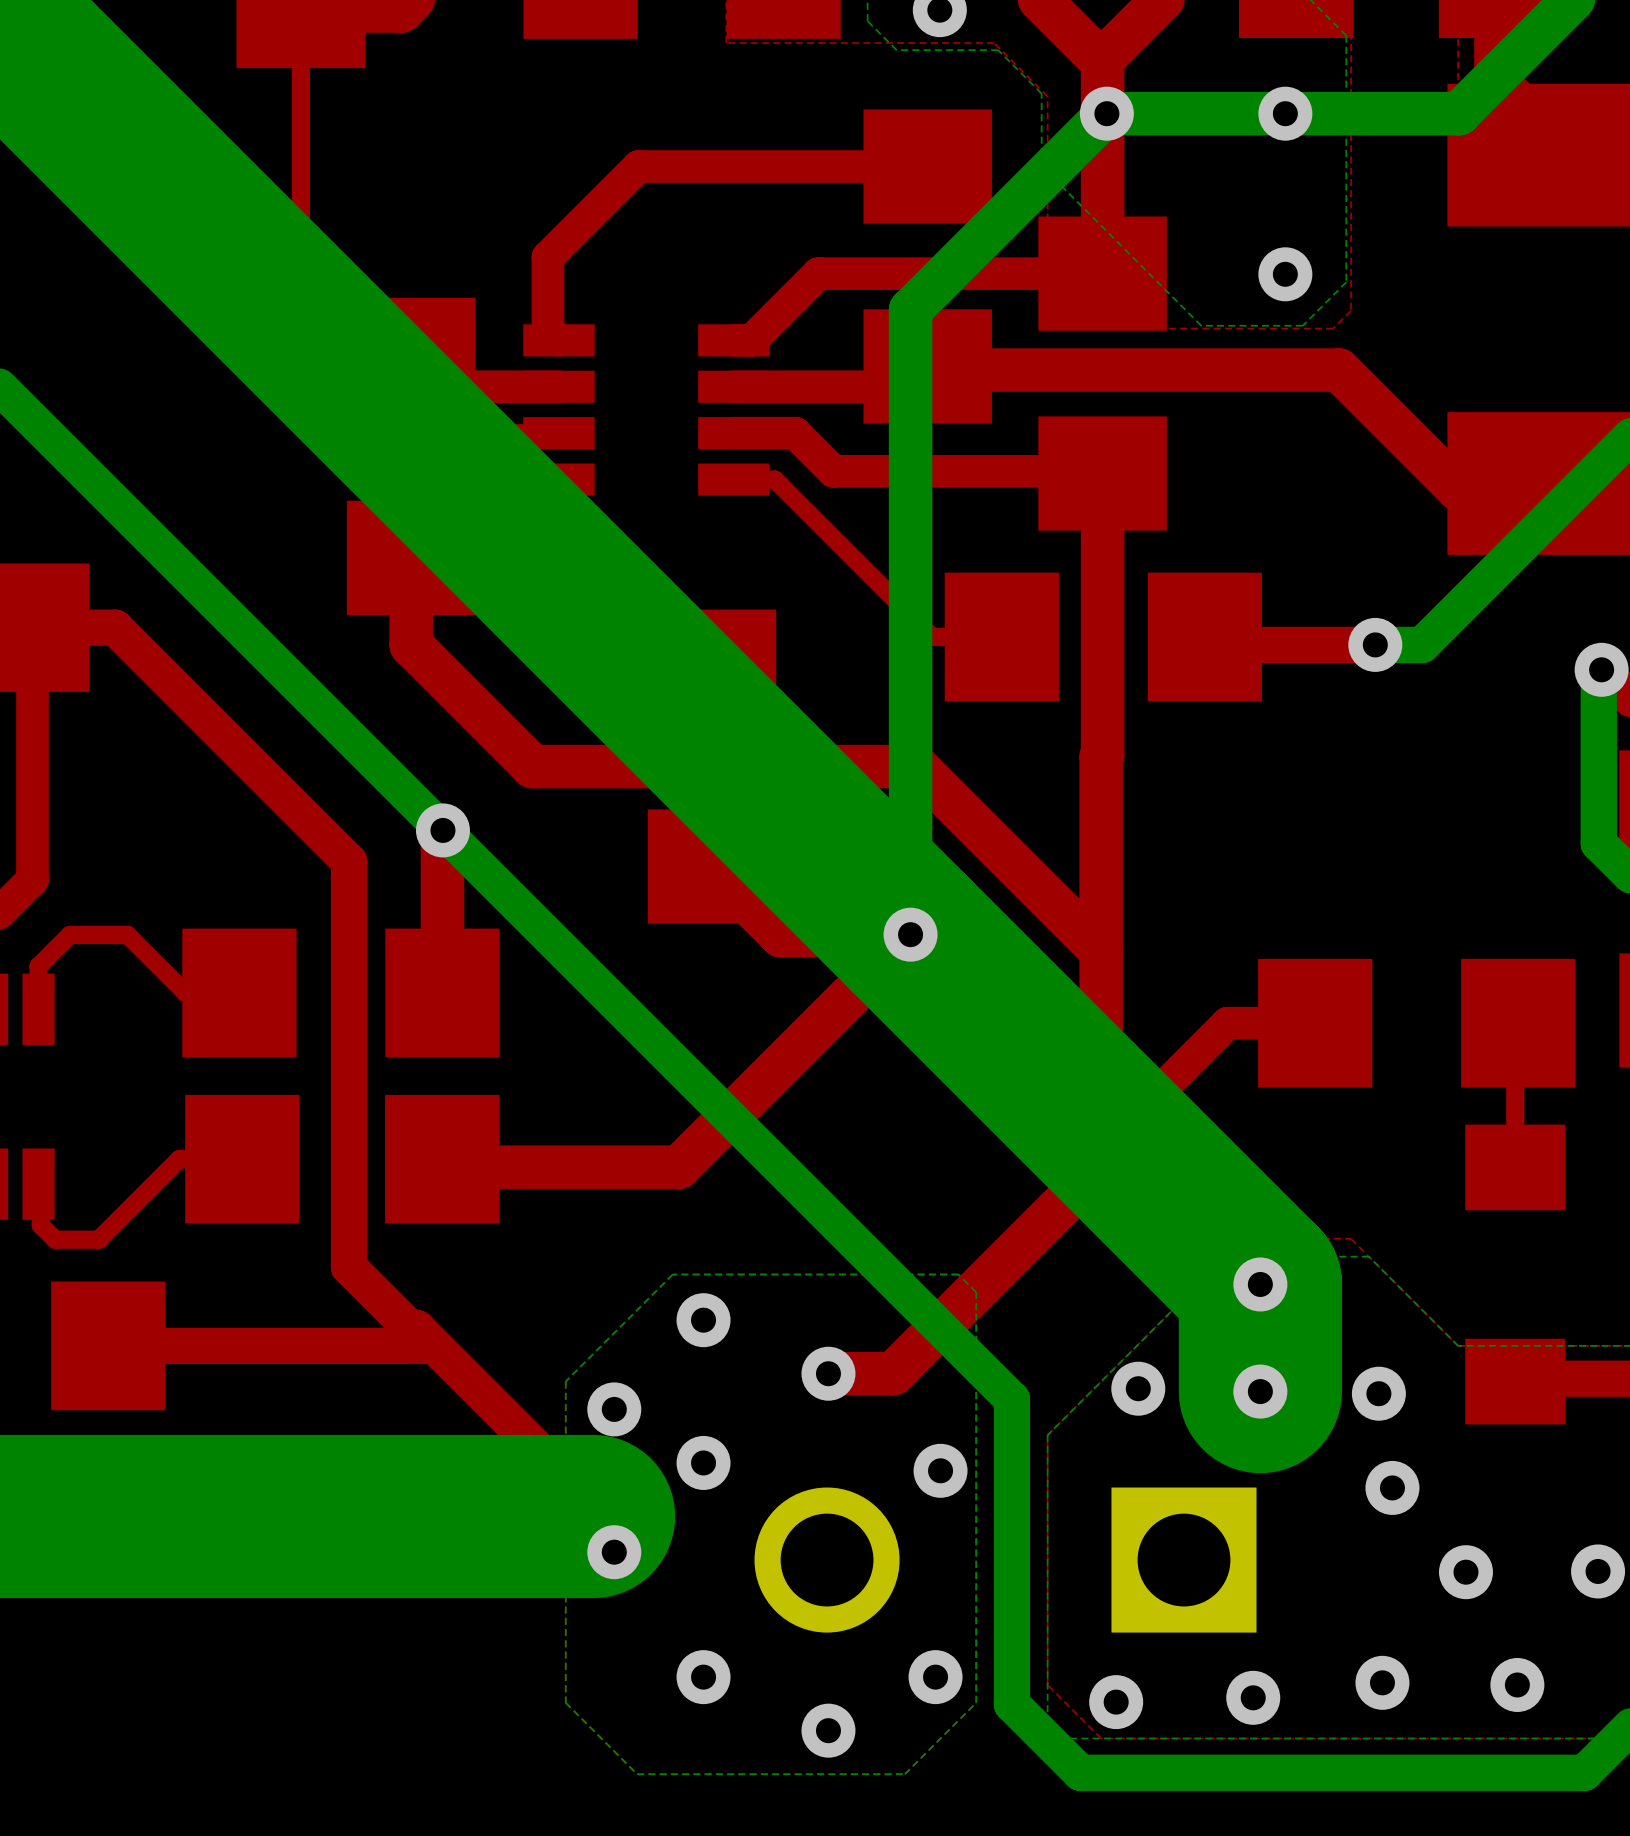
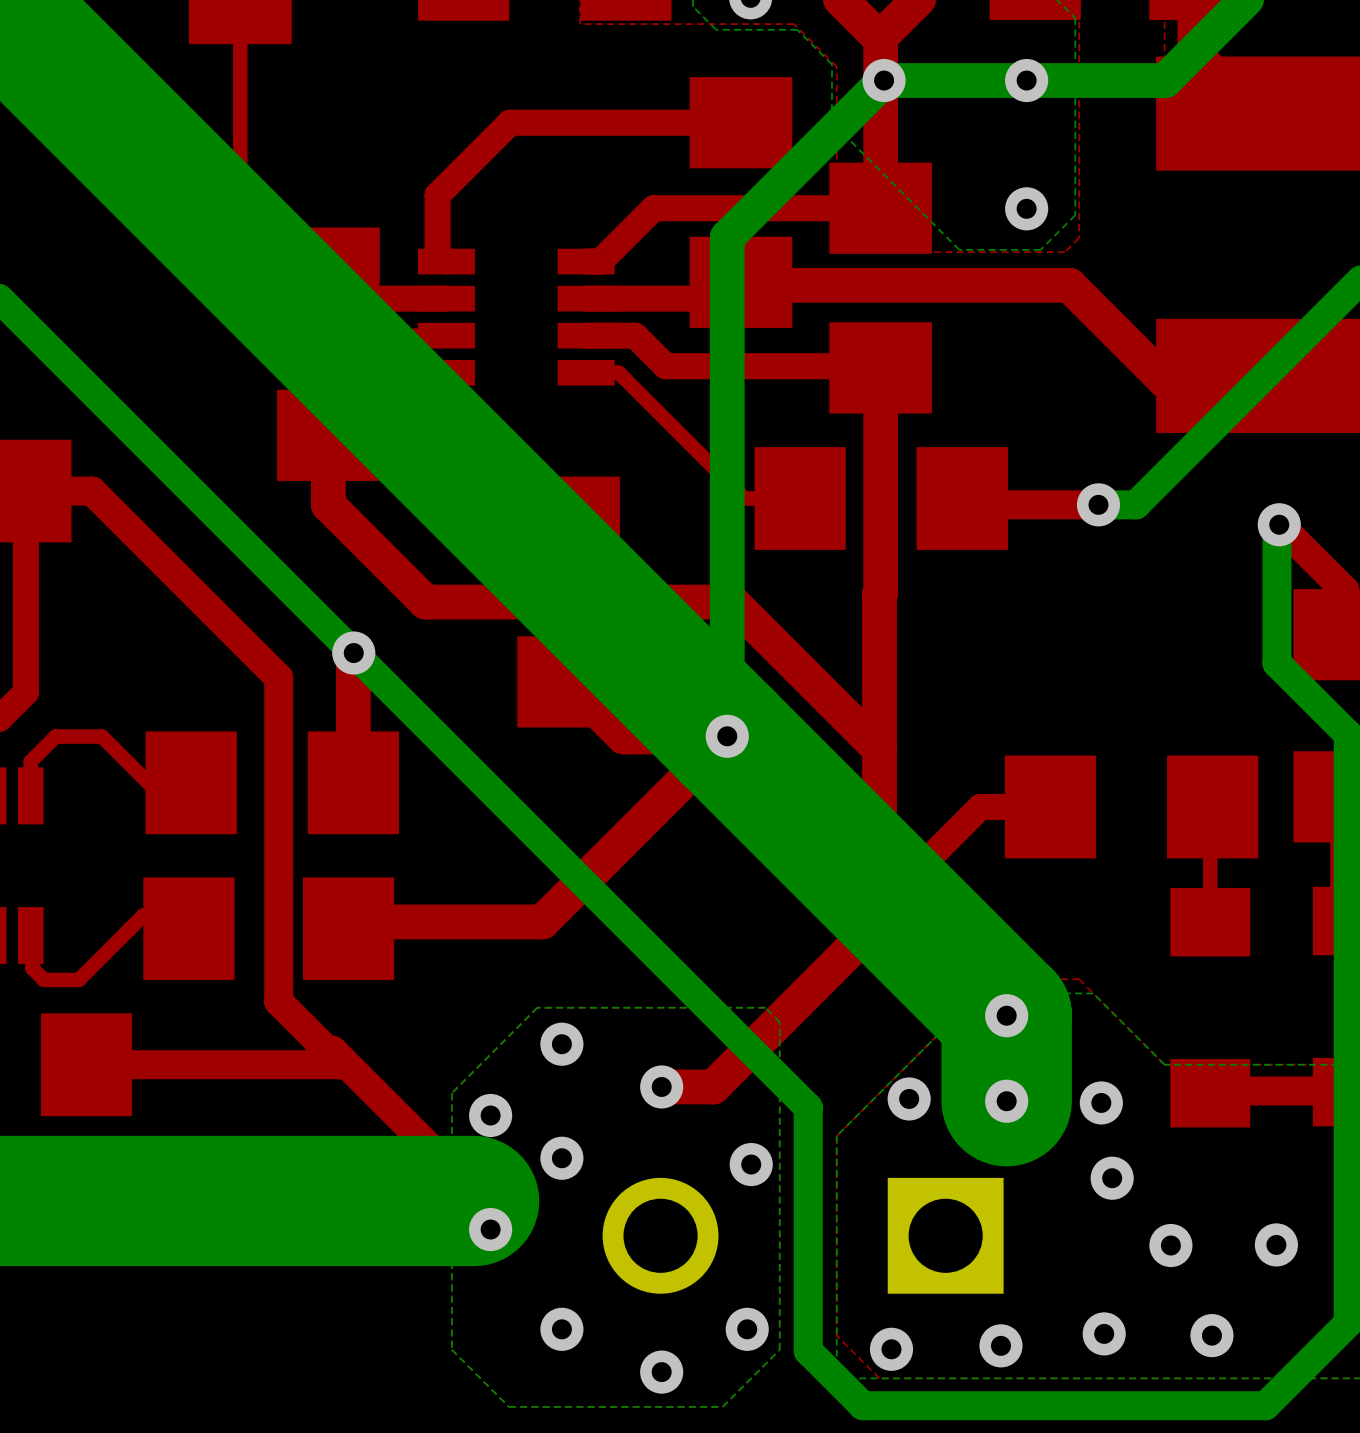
part position: (342, 1159) -> (268, 928)

